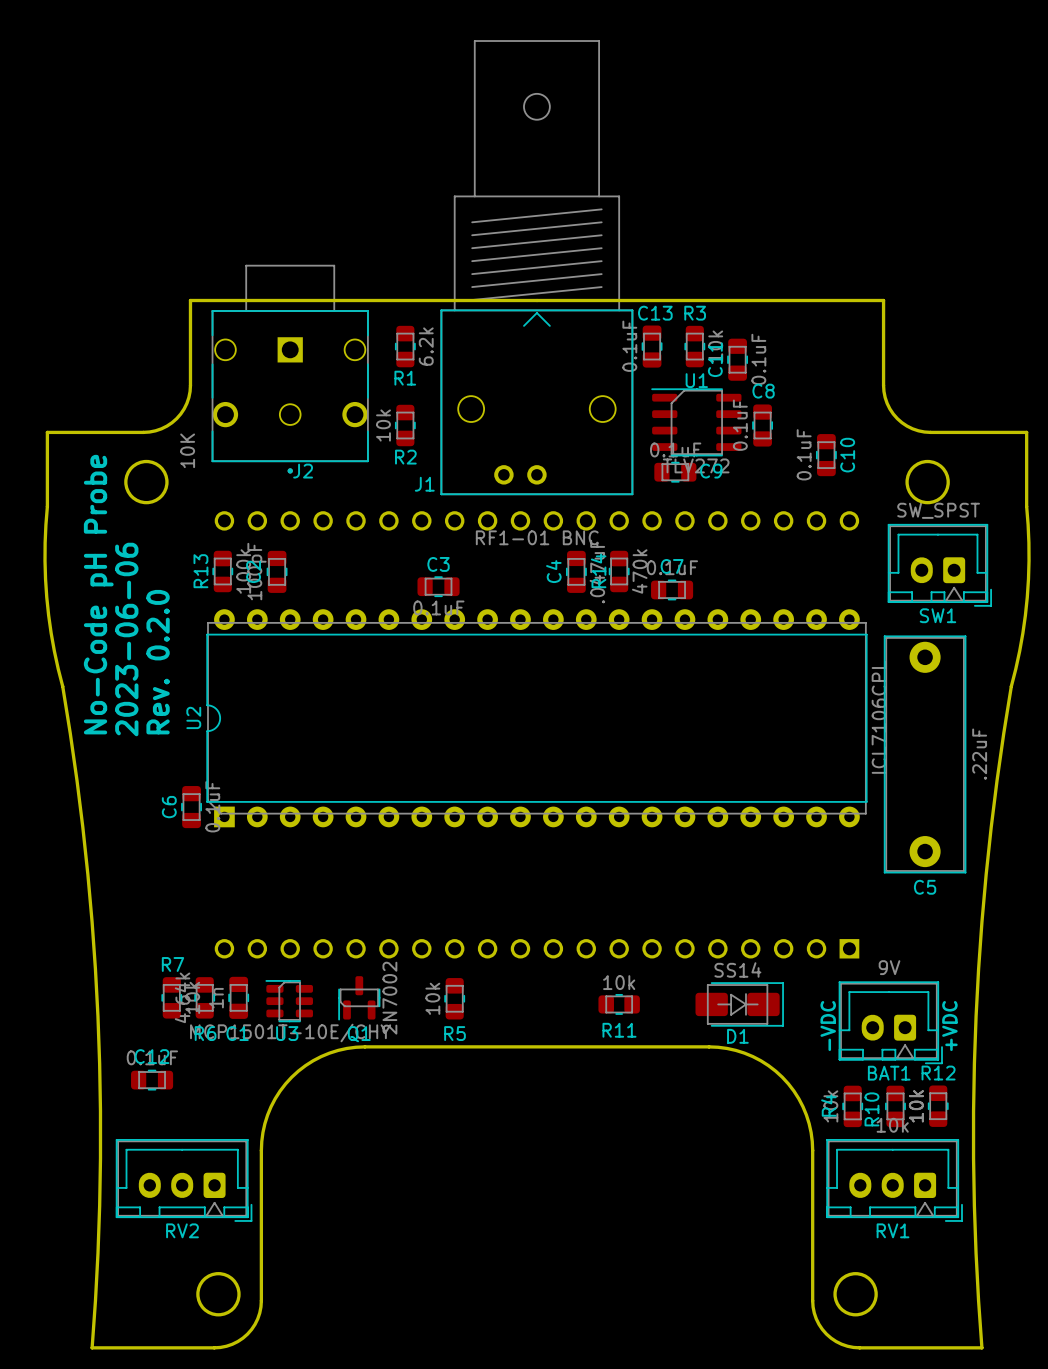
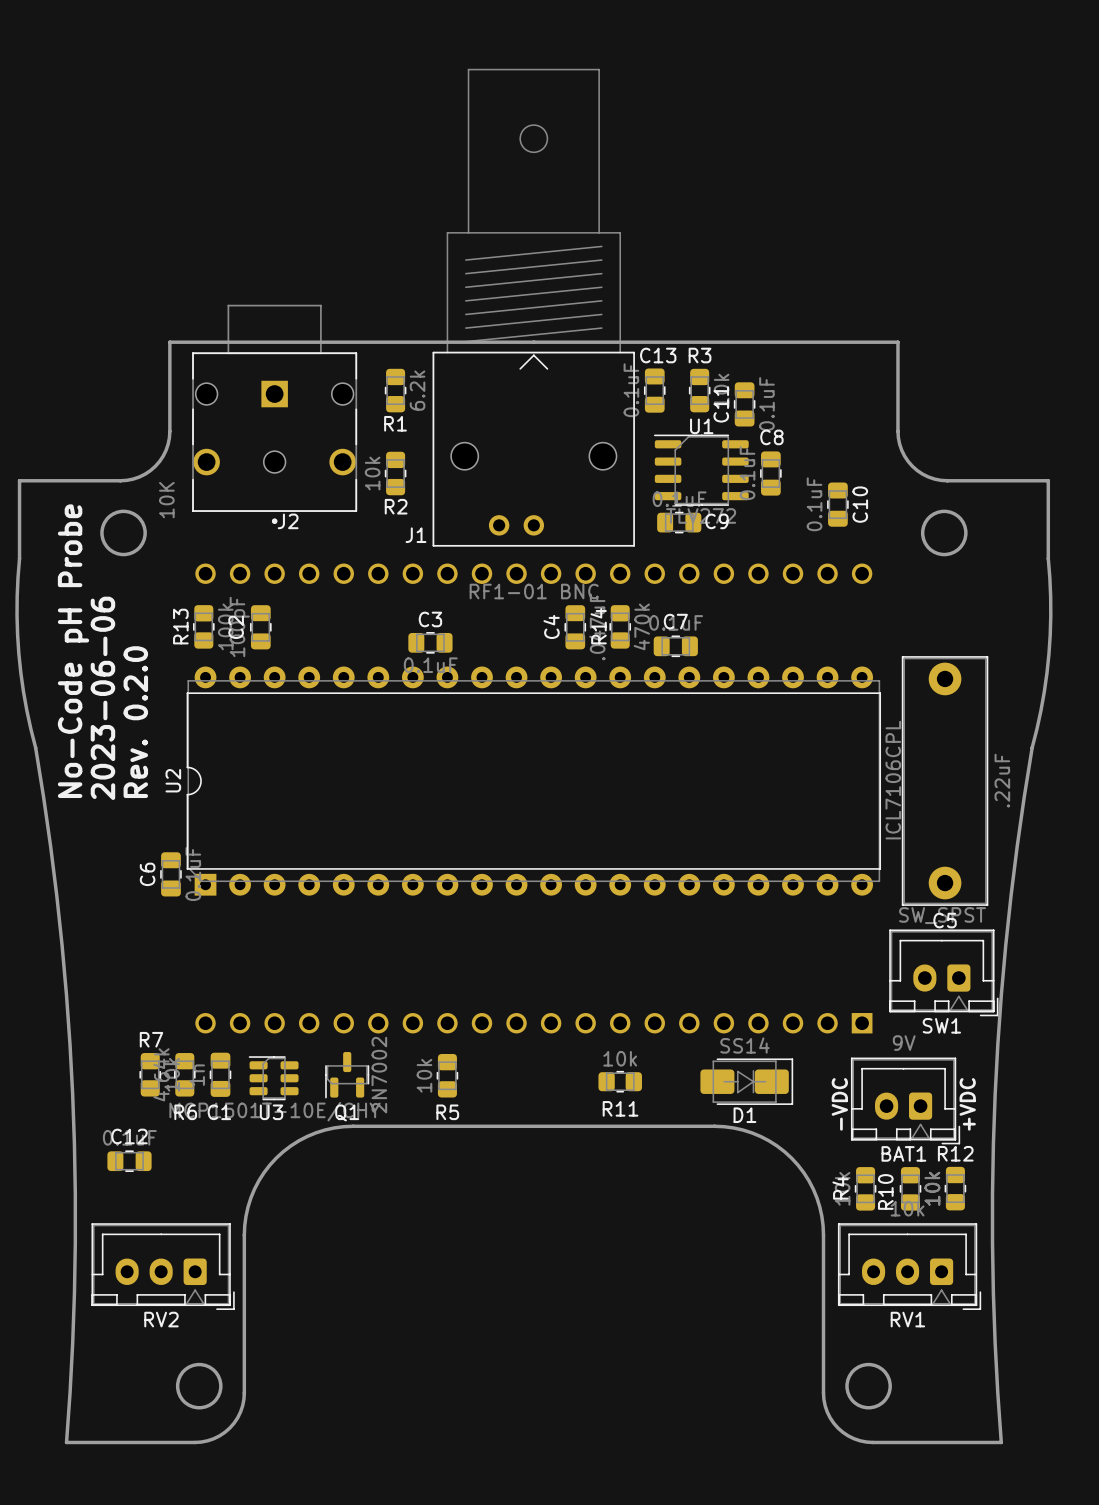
SW1 position: (939, 565) -> (943, 972)
C5 position: (925, 754) -> (945, 781)

